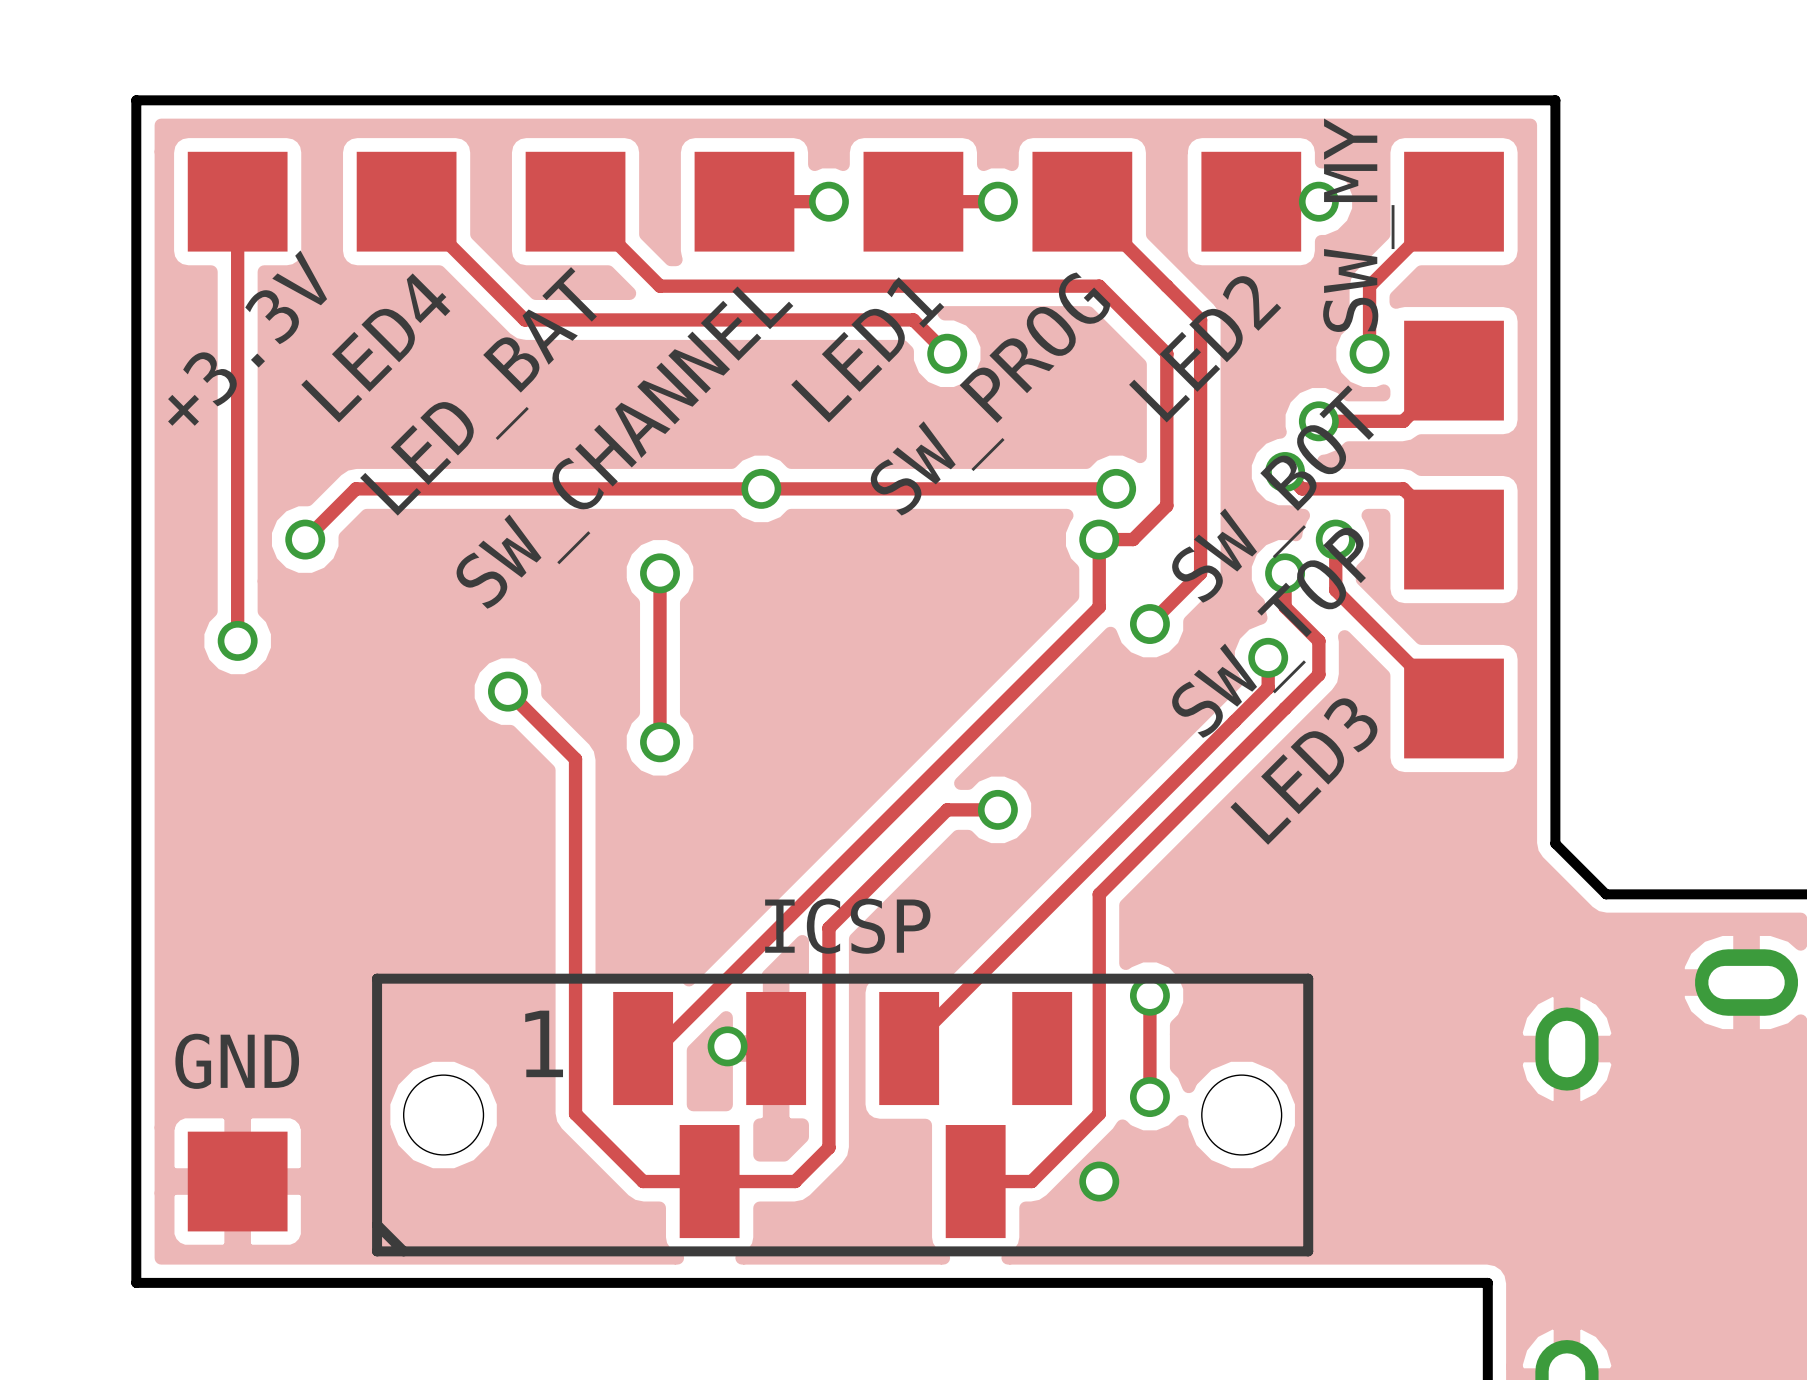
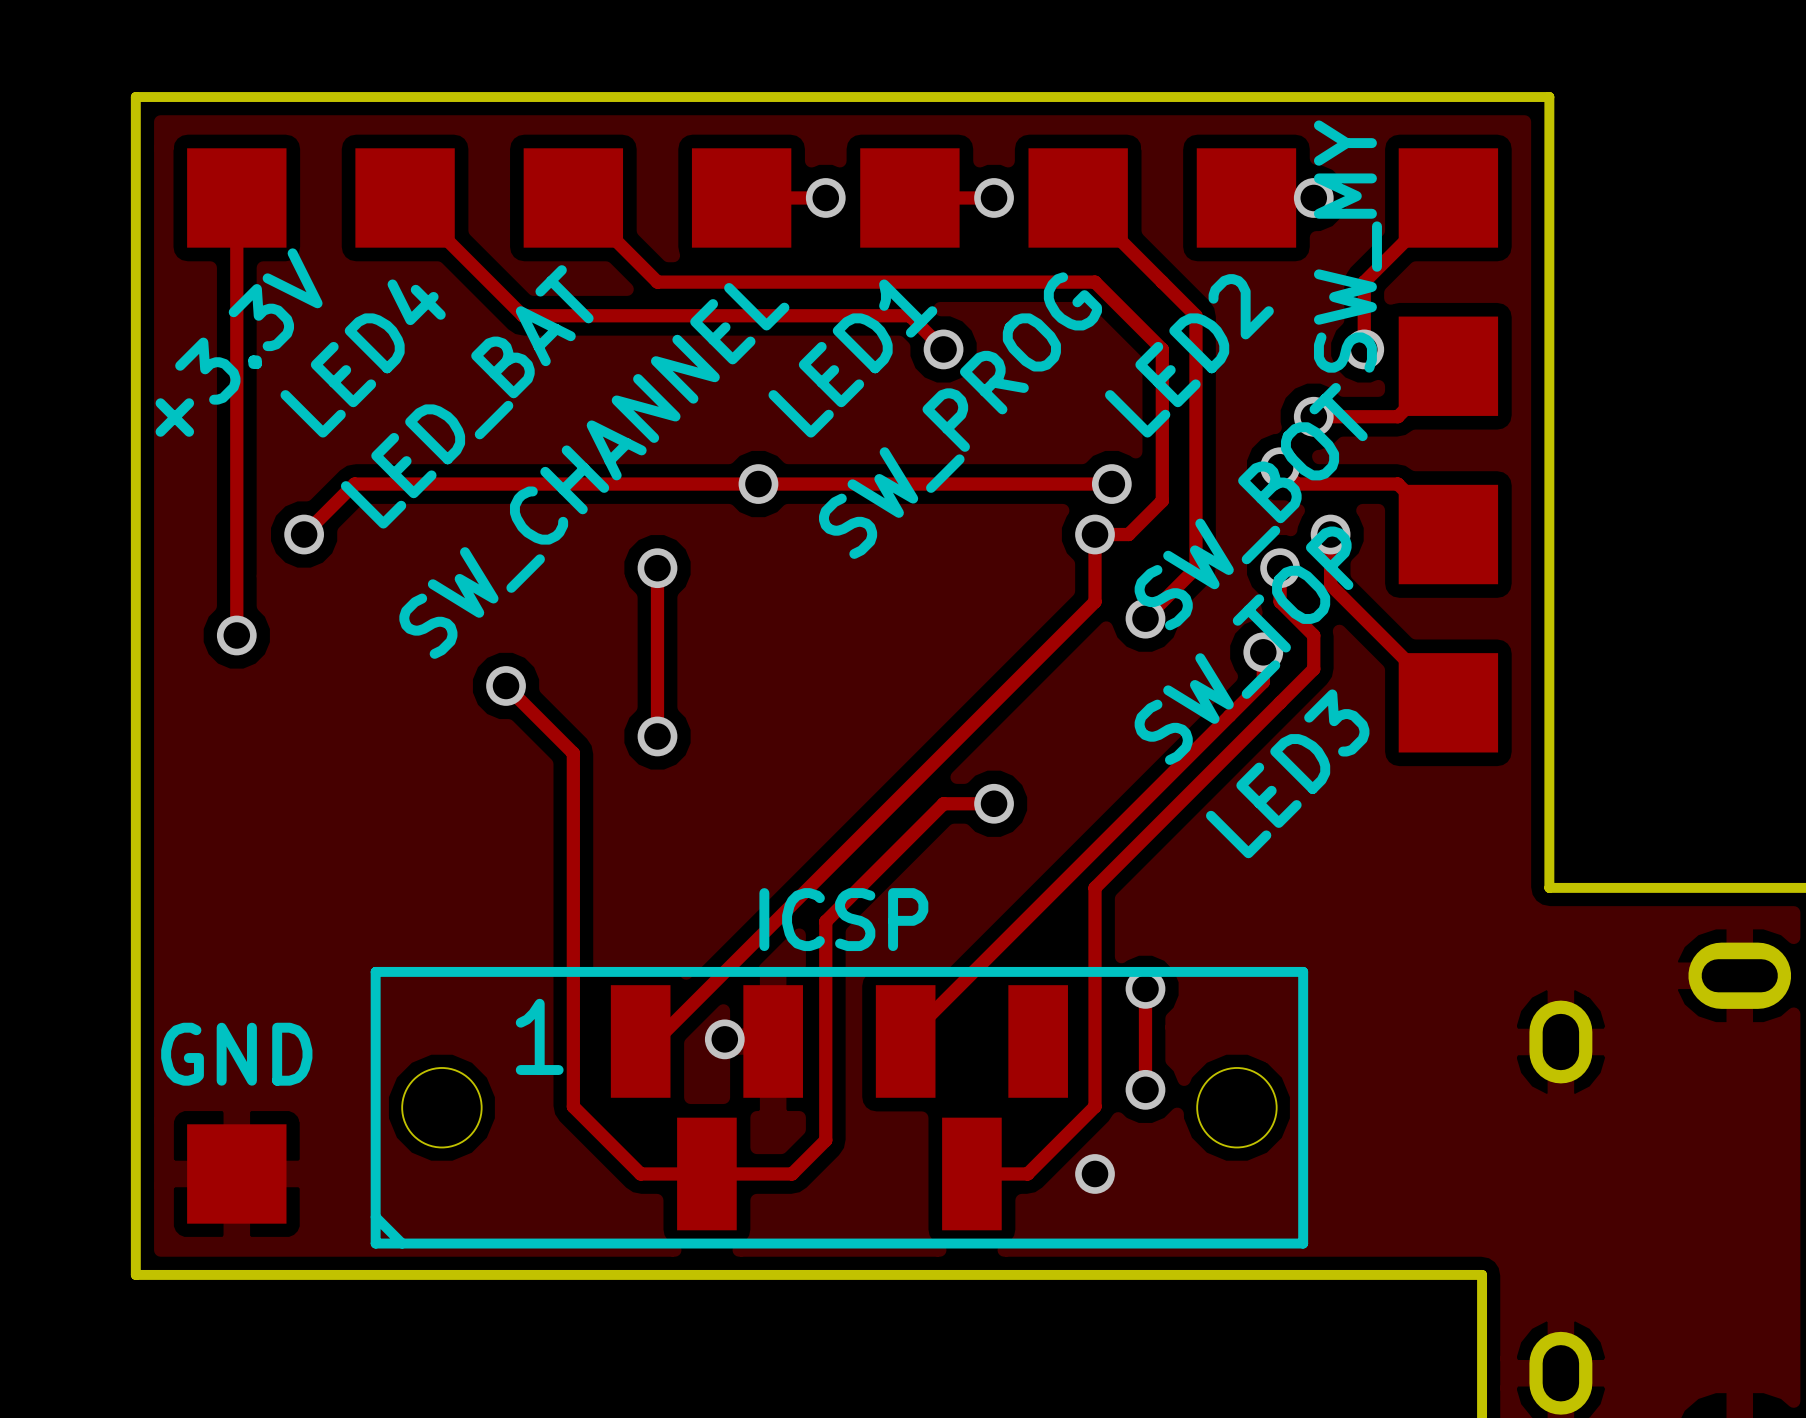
board edge: (1555, 843) (1606, 894) -> (1549, 837) (1549, 887) (1599, 887)

